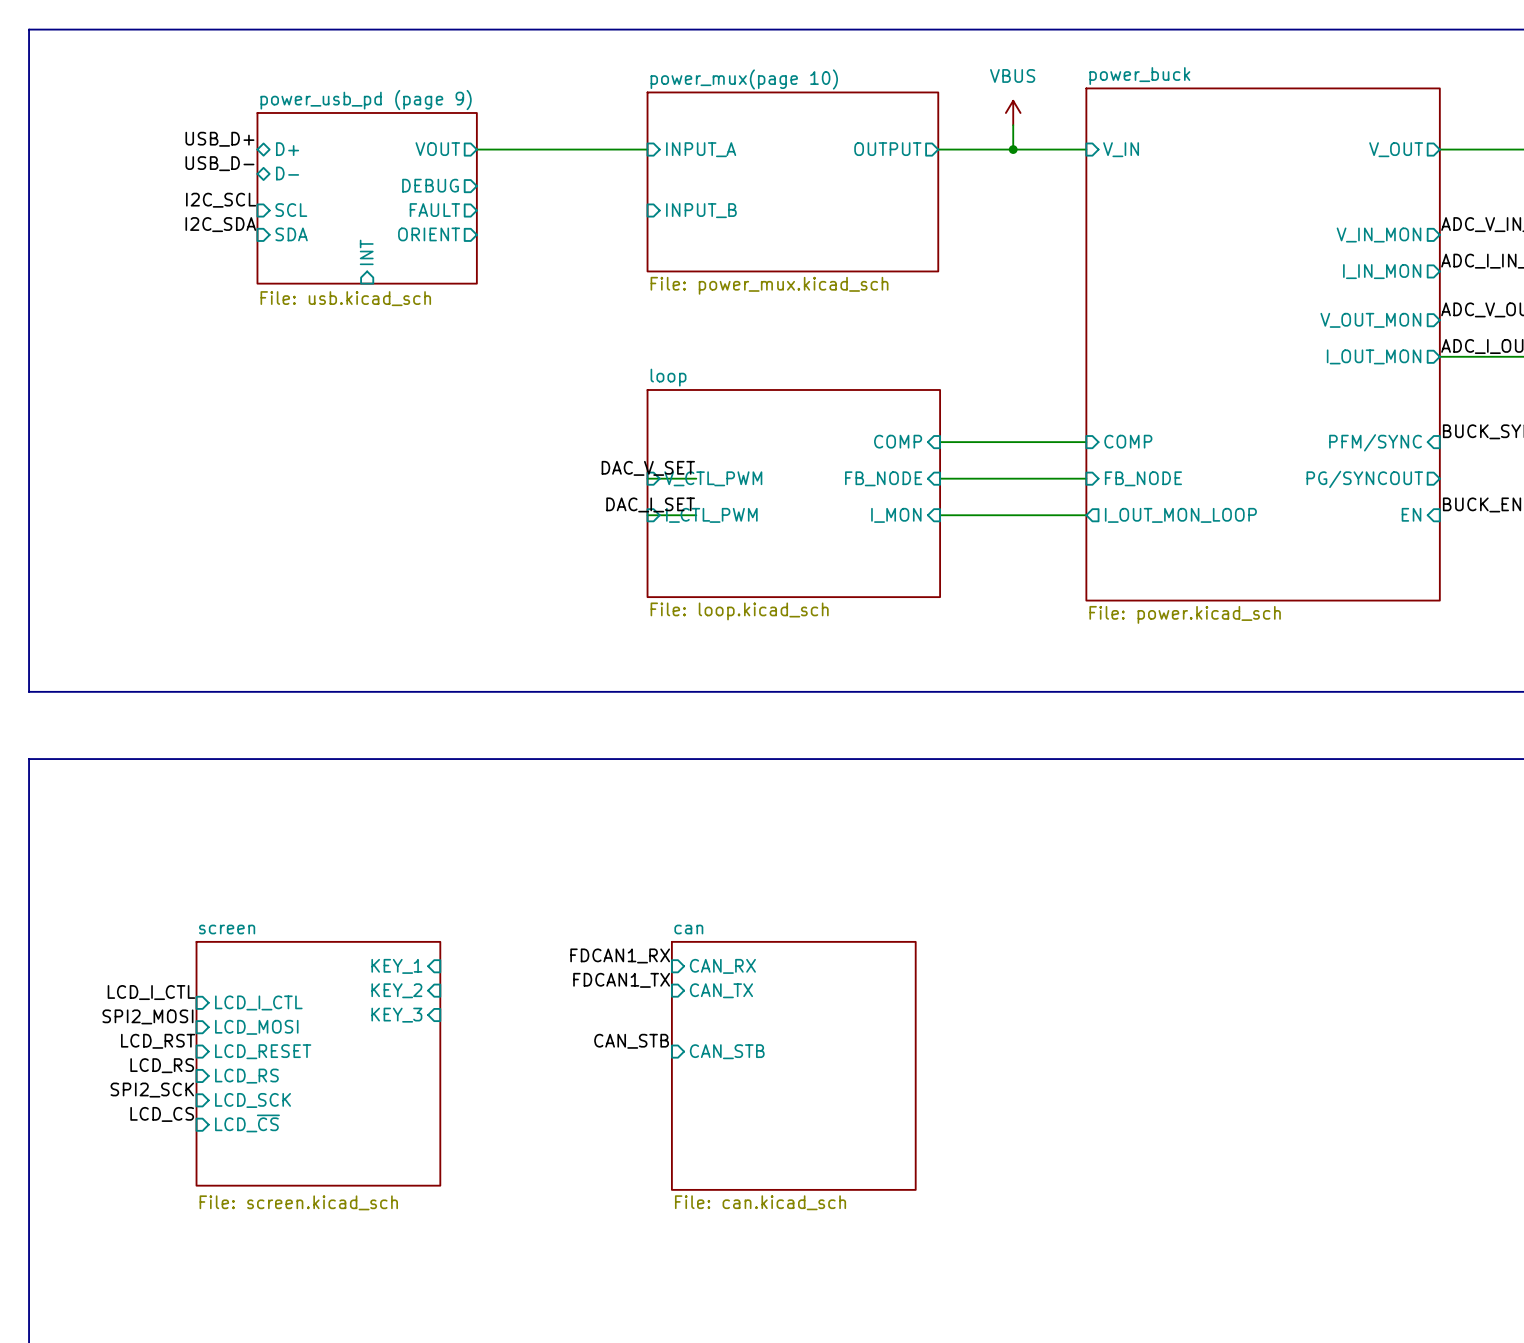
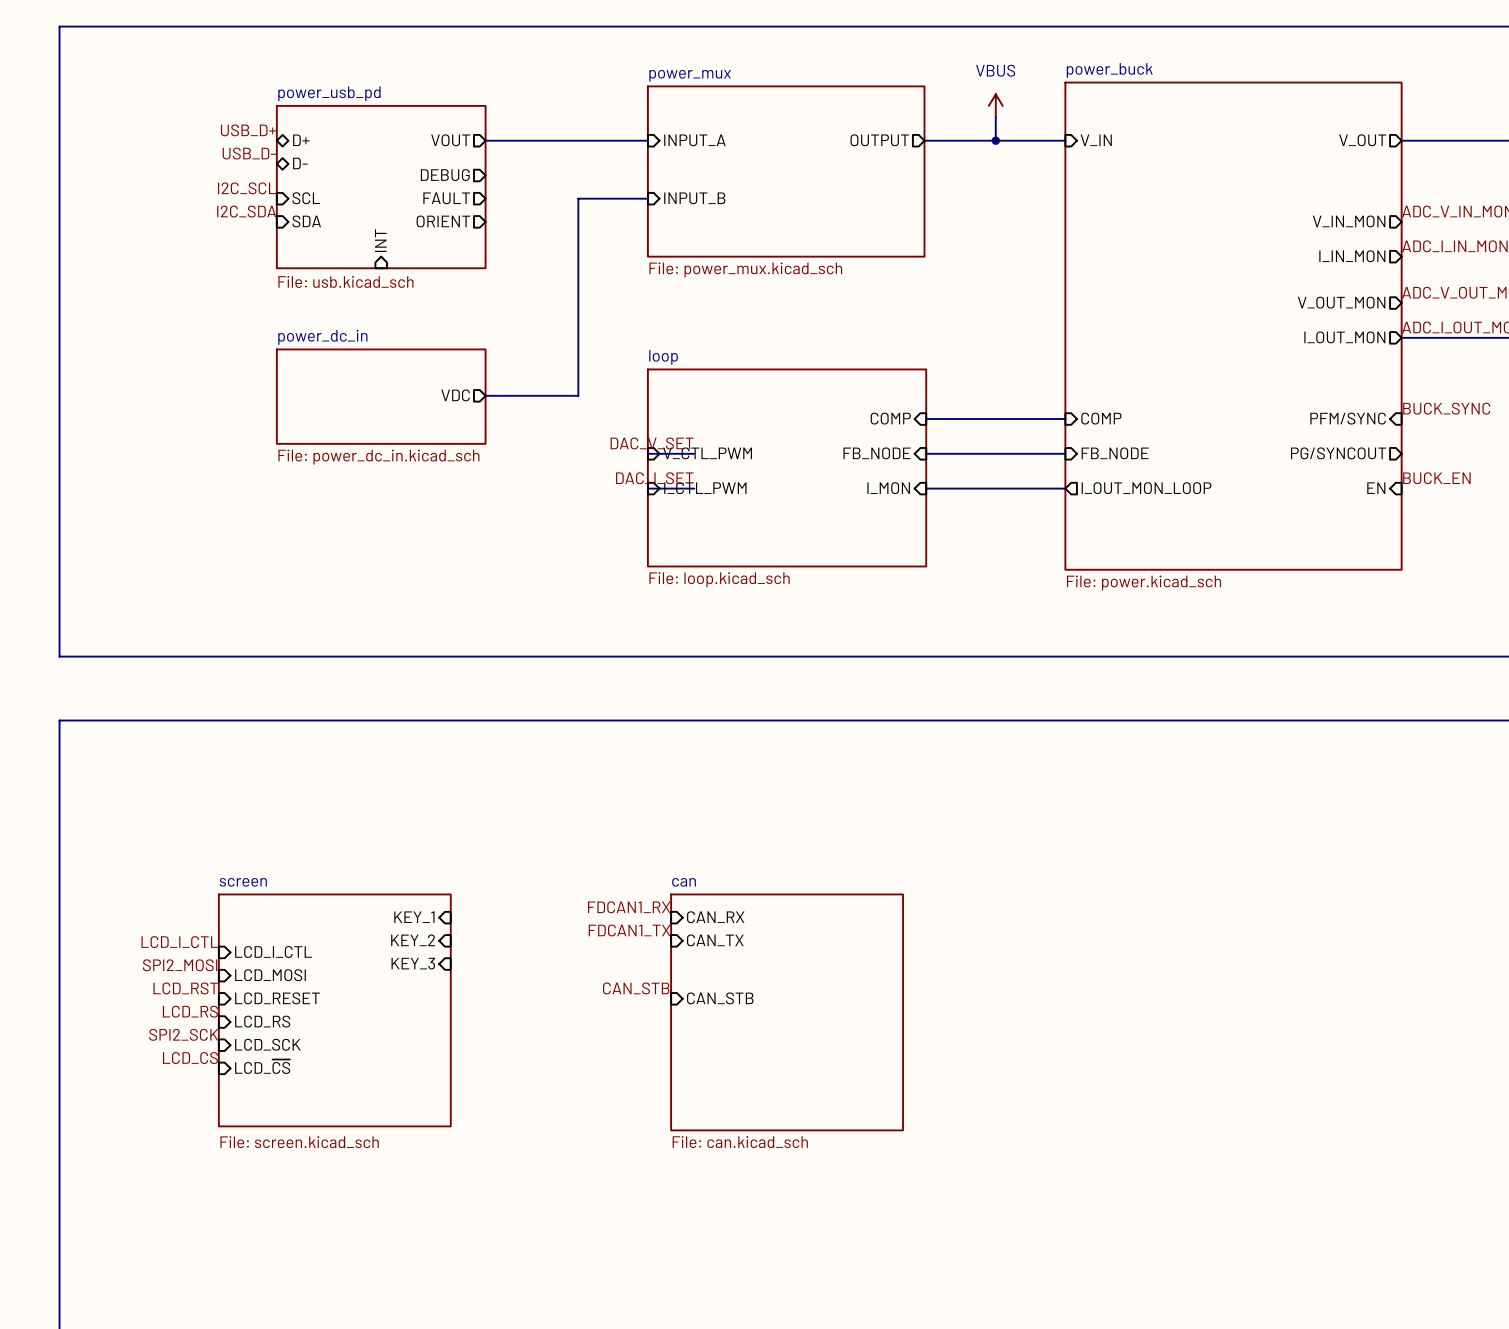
sheet power_mux(page 10) name: power_mux(page 10) (744, 79) -> power_mux (690, 75)
sheet power_usb_pd (page 9) name: power_usb_pd (page 9) (366, 100) -> power_usb_pd (329, 93)
wire: none -> (647, 198) (578, 198) (578, 395) (485, 395)
sheet pin: none -> VDC (455, 395)
sheet power_dc_in: none -> File: power_dc_in.kicad_sch (381, 396)

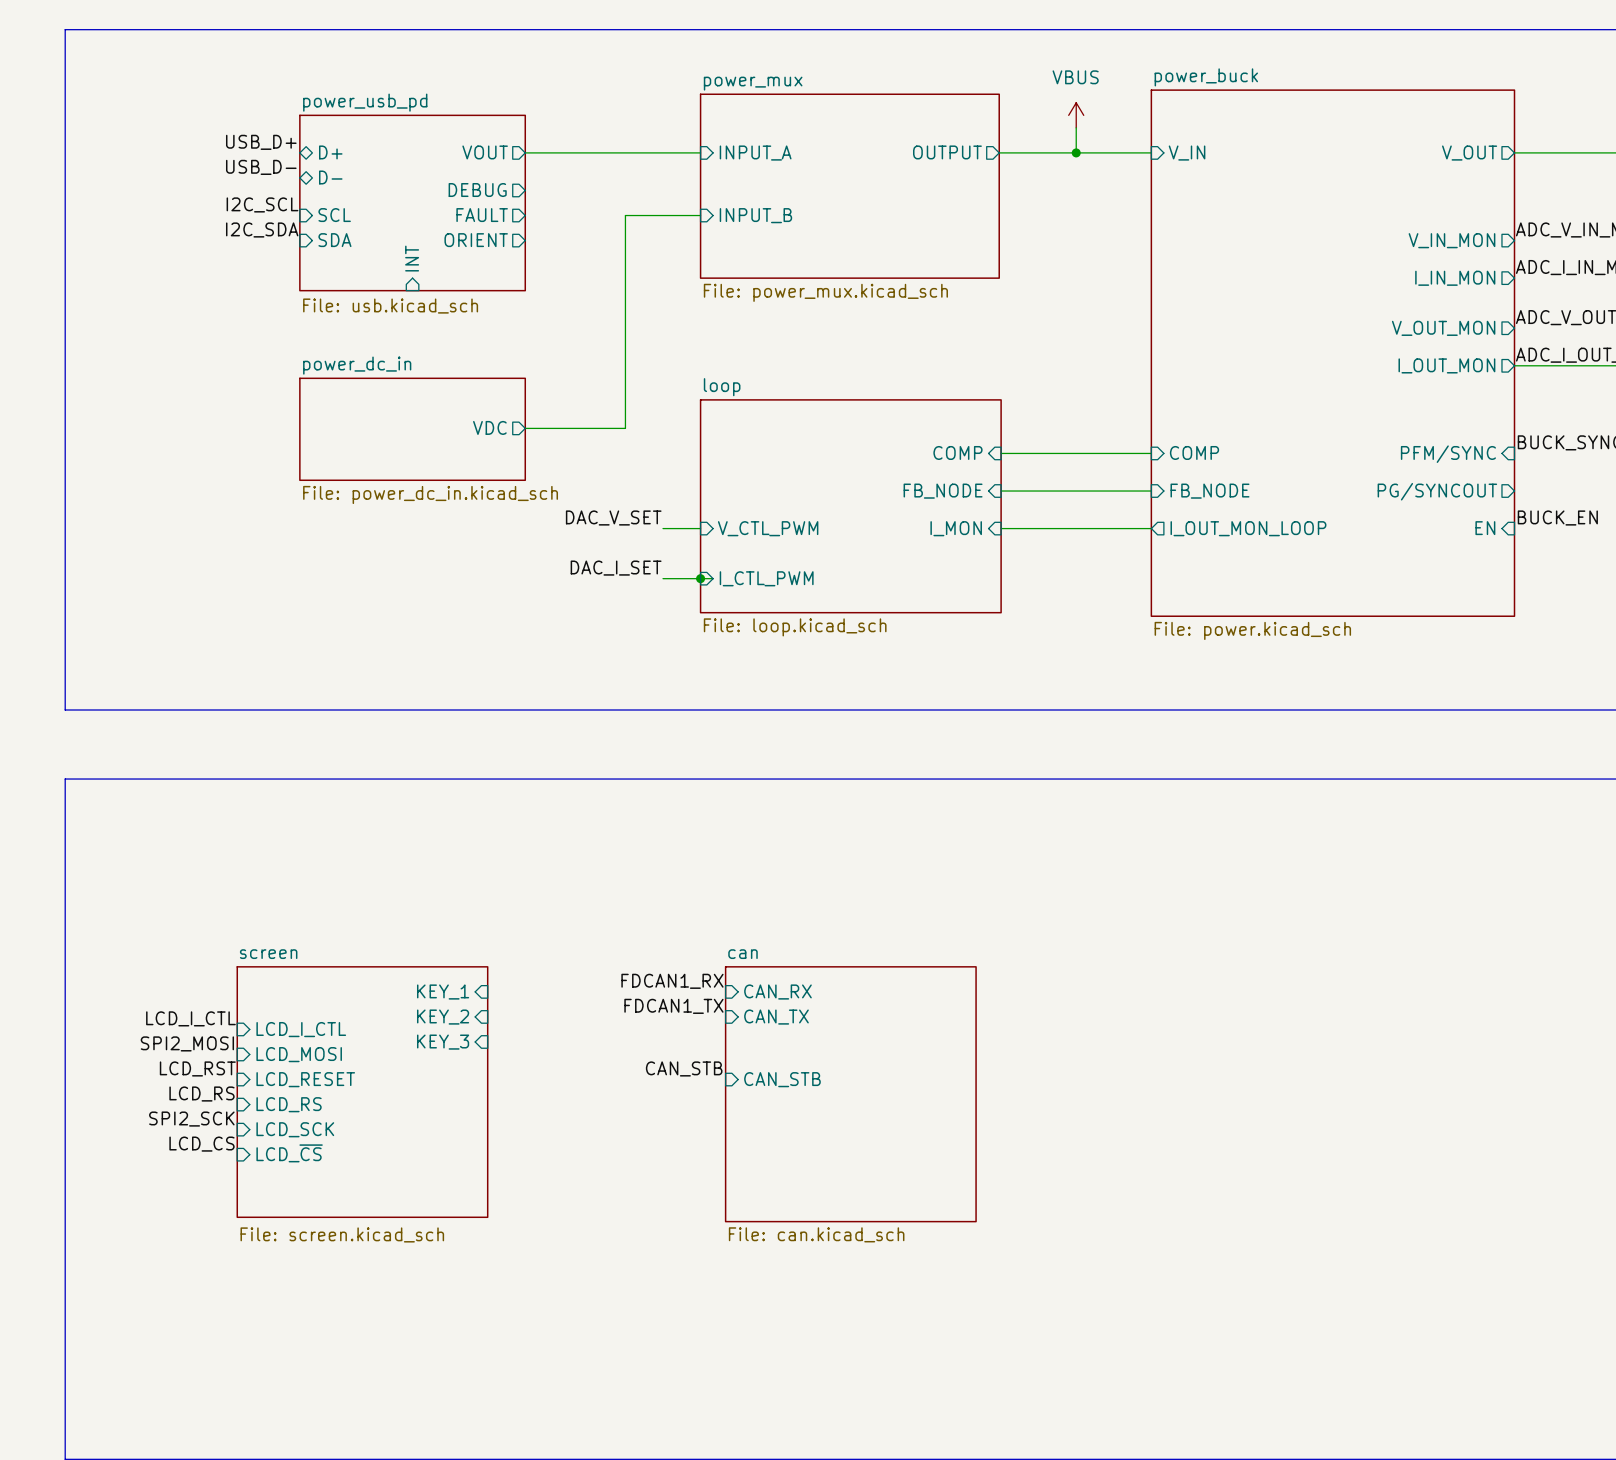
label position: DAC_V_SET (652, 443) -> DAC_V_SET (613, 518)
wire: (647, 453) (694, 453) -> (663, 578) (713, 578)
sheet pin: V_CTL_PWM (707, 453) -> none
label position: DAC_I_SET (654, 478) -> DAC_I_SET (616, 568)
wire: (647, 488) (694, 488) -> (700, 528) (663, 528)
sheet pin: I_CTL_PWM (705, 488) -> V_CTL_PWM (768, 528)
junction: none -> (700, 578)
sheet pin: none -> I_CTL_PWM (766, 578)

